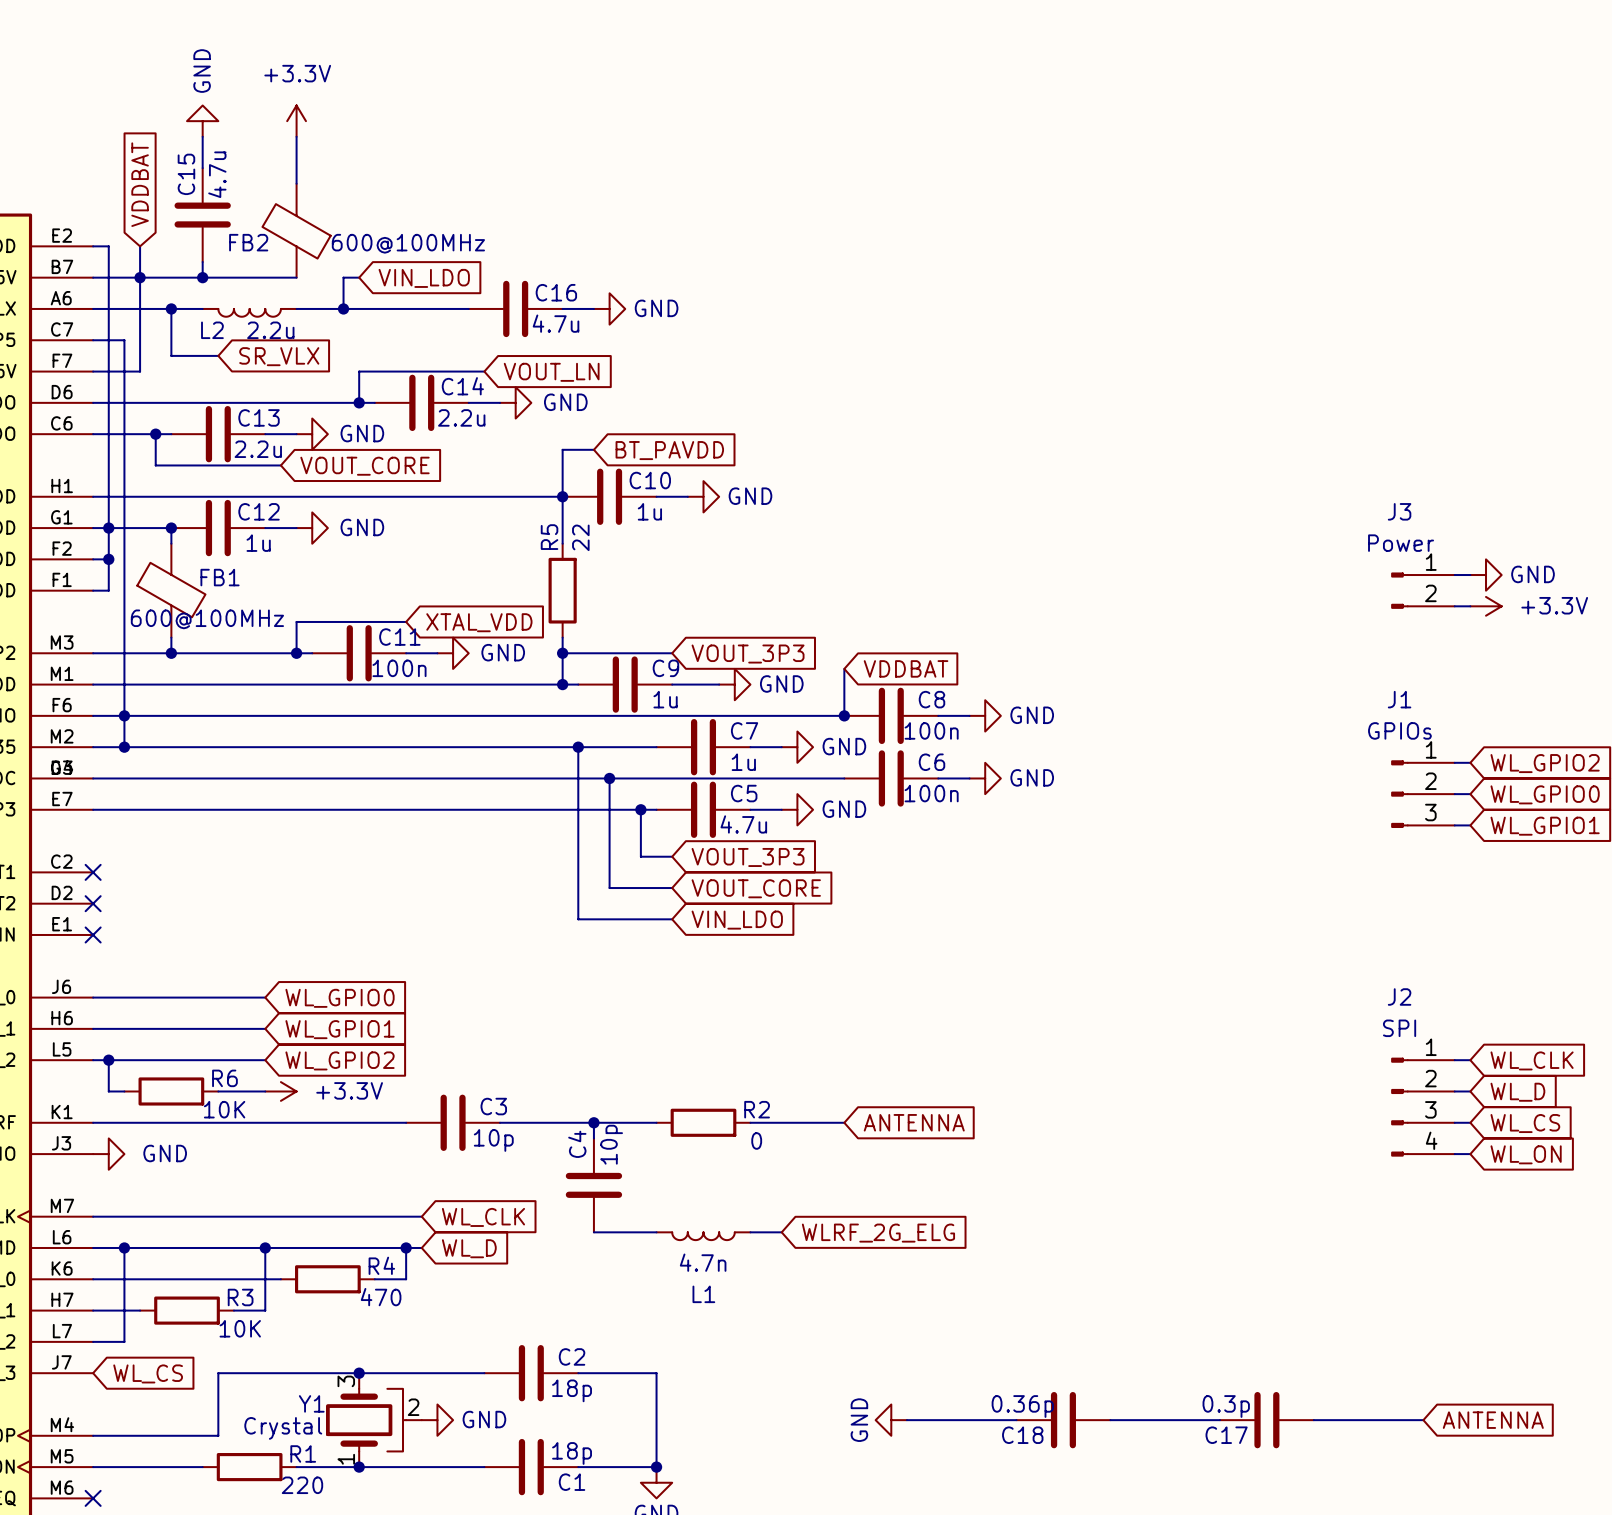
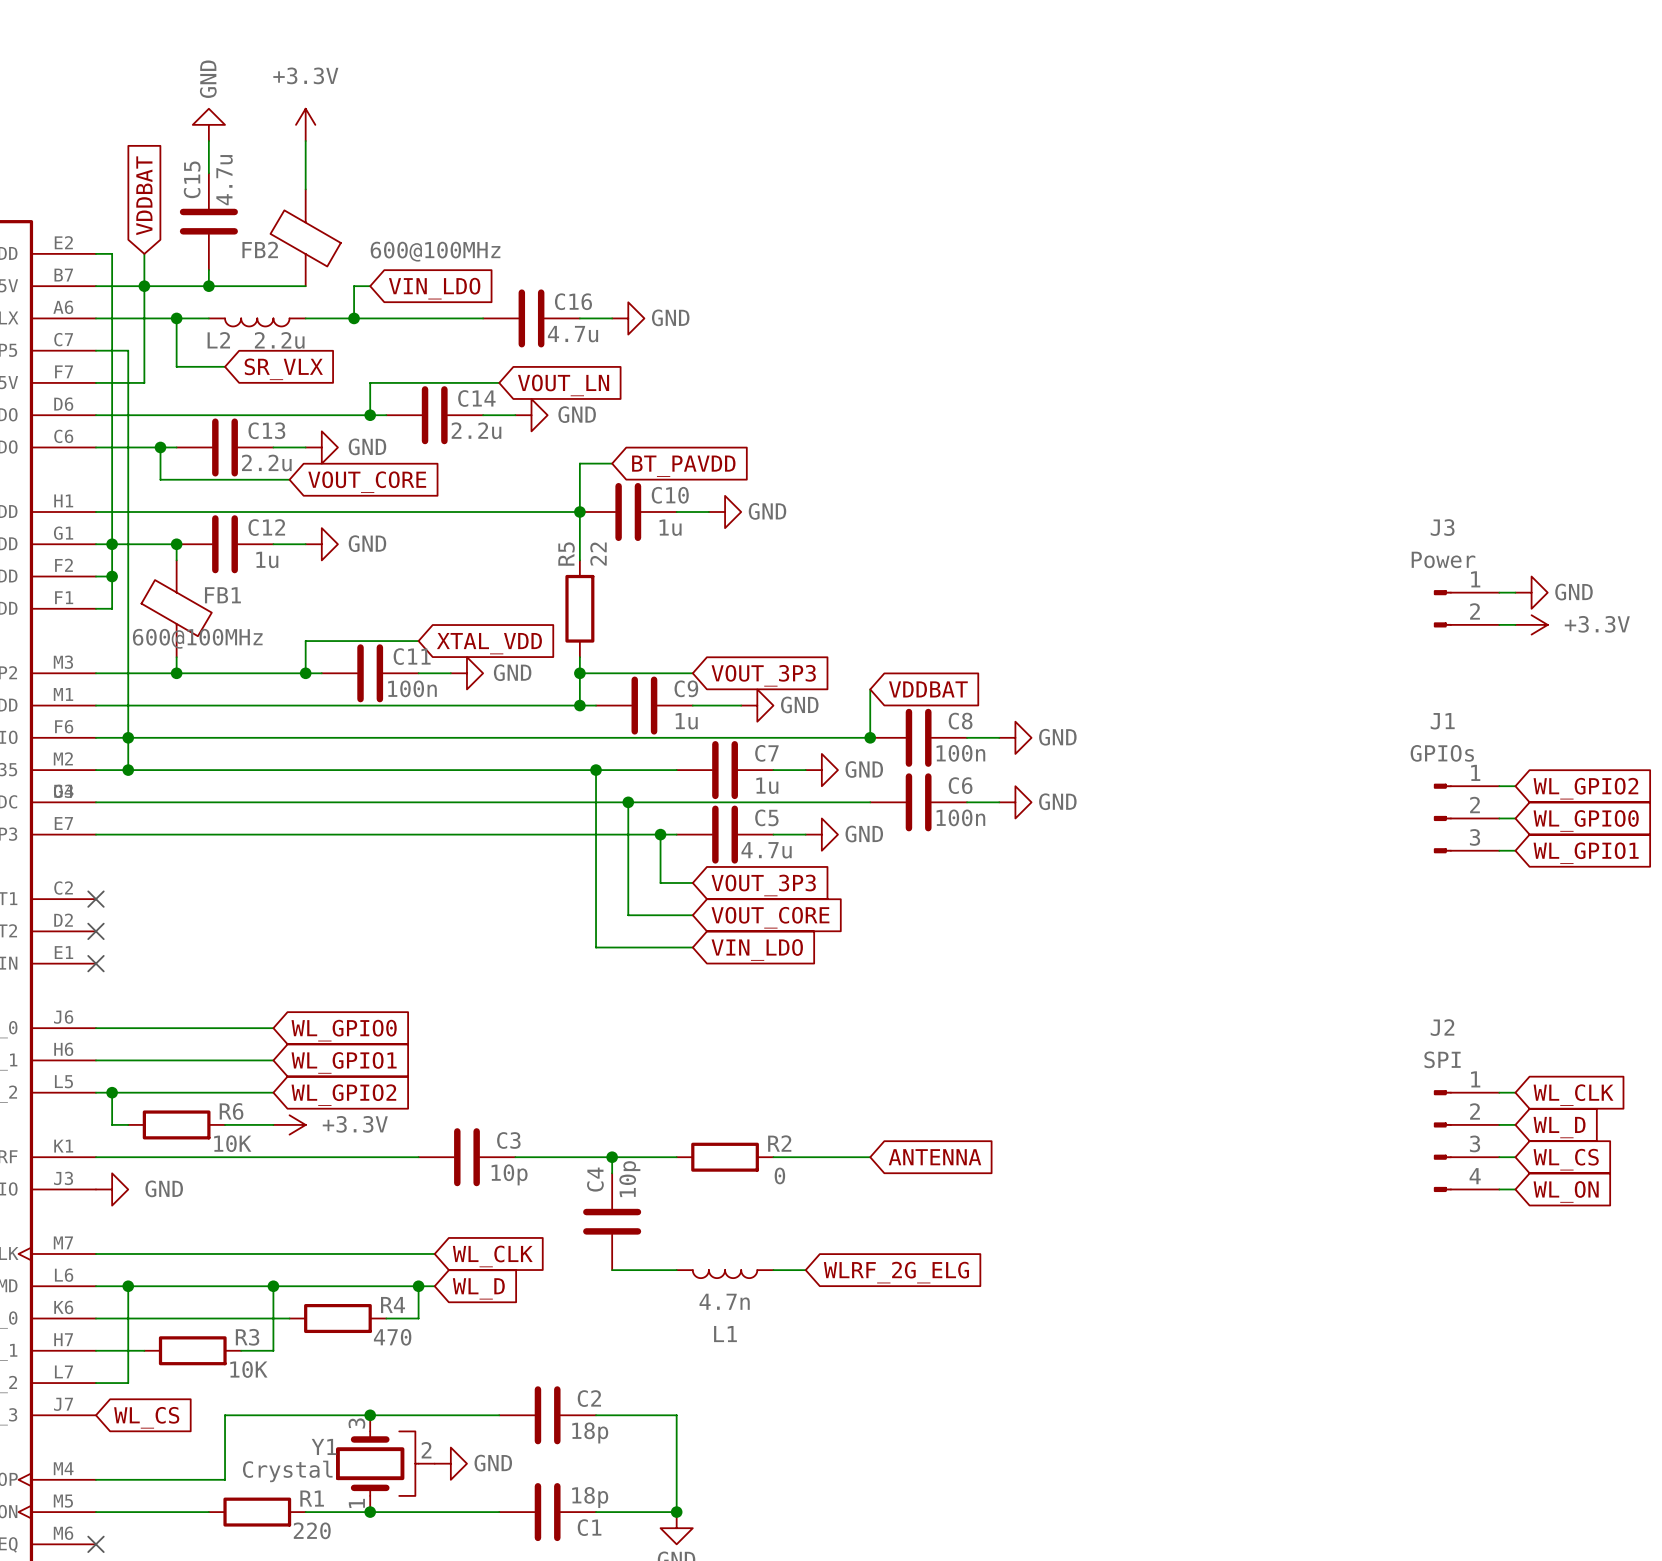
power symbol: GND (891, 1420) -> none
wire: (906, 1420) (1016, 1420) -> none
C18: 0.36p (1063, 1420) -> none
wire: (1110, 1420) (1219, 1420) -> none
C17: 0.3p (1266, 1420) -> none
wire: (1313, 1420) (1423, 1420) -> none
global label: ANTENNA (1493, 1420) -> none

